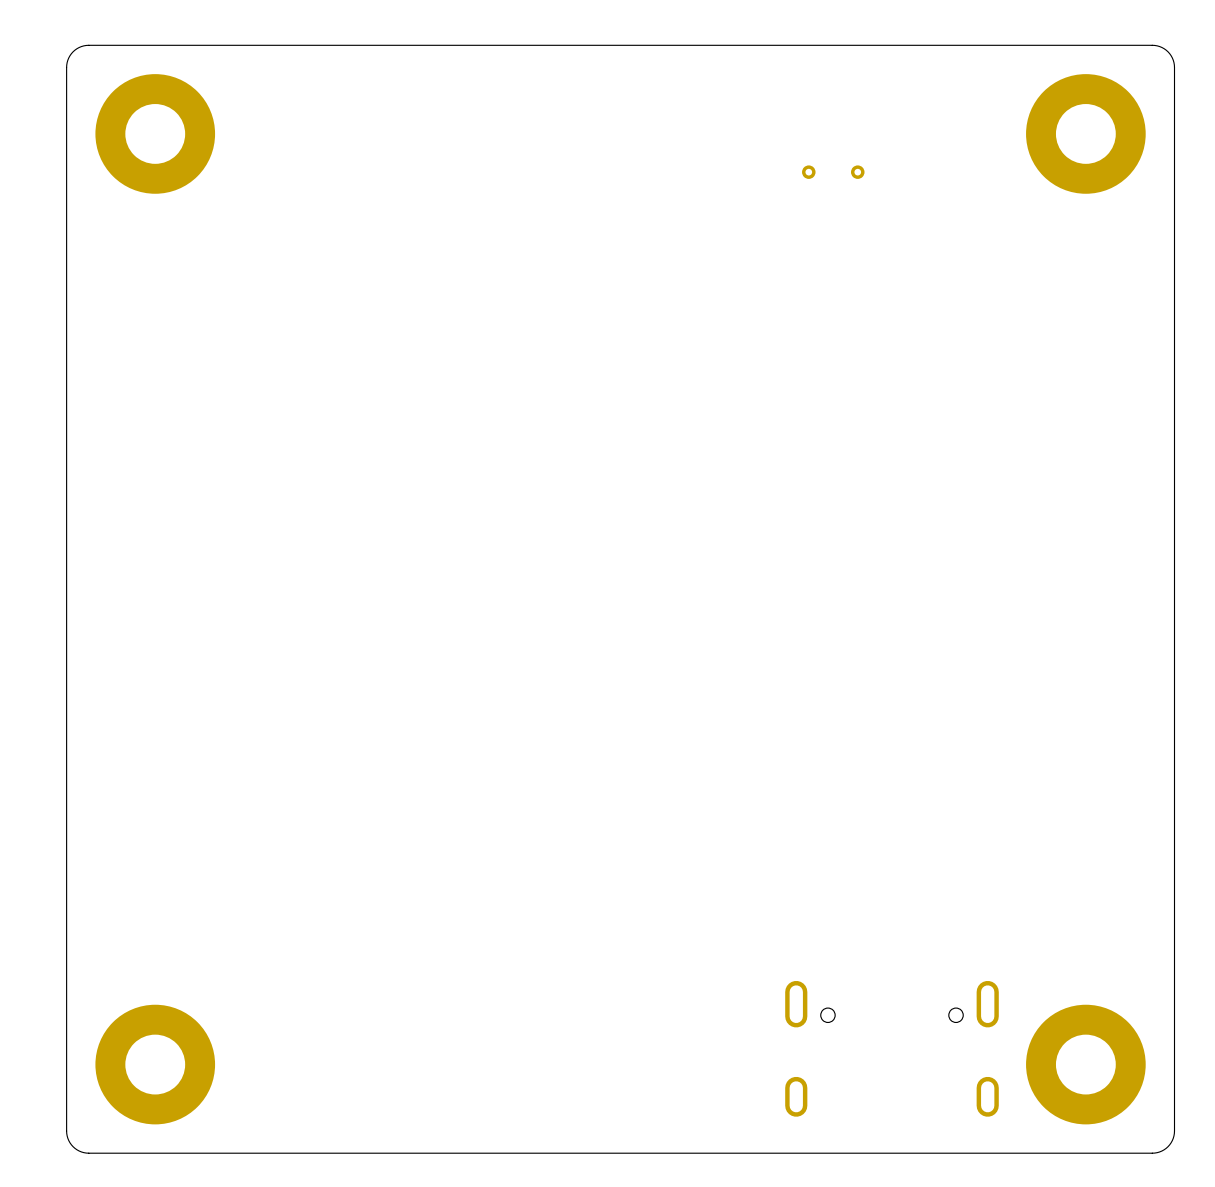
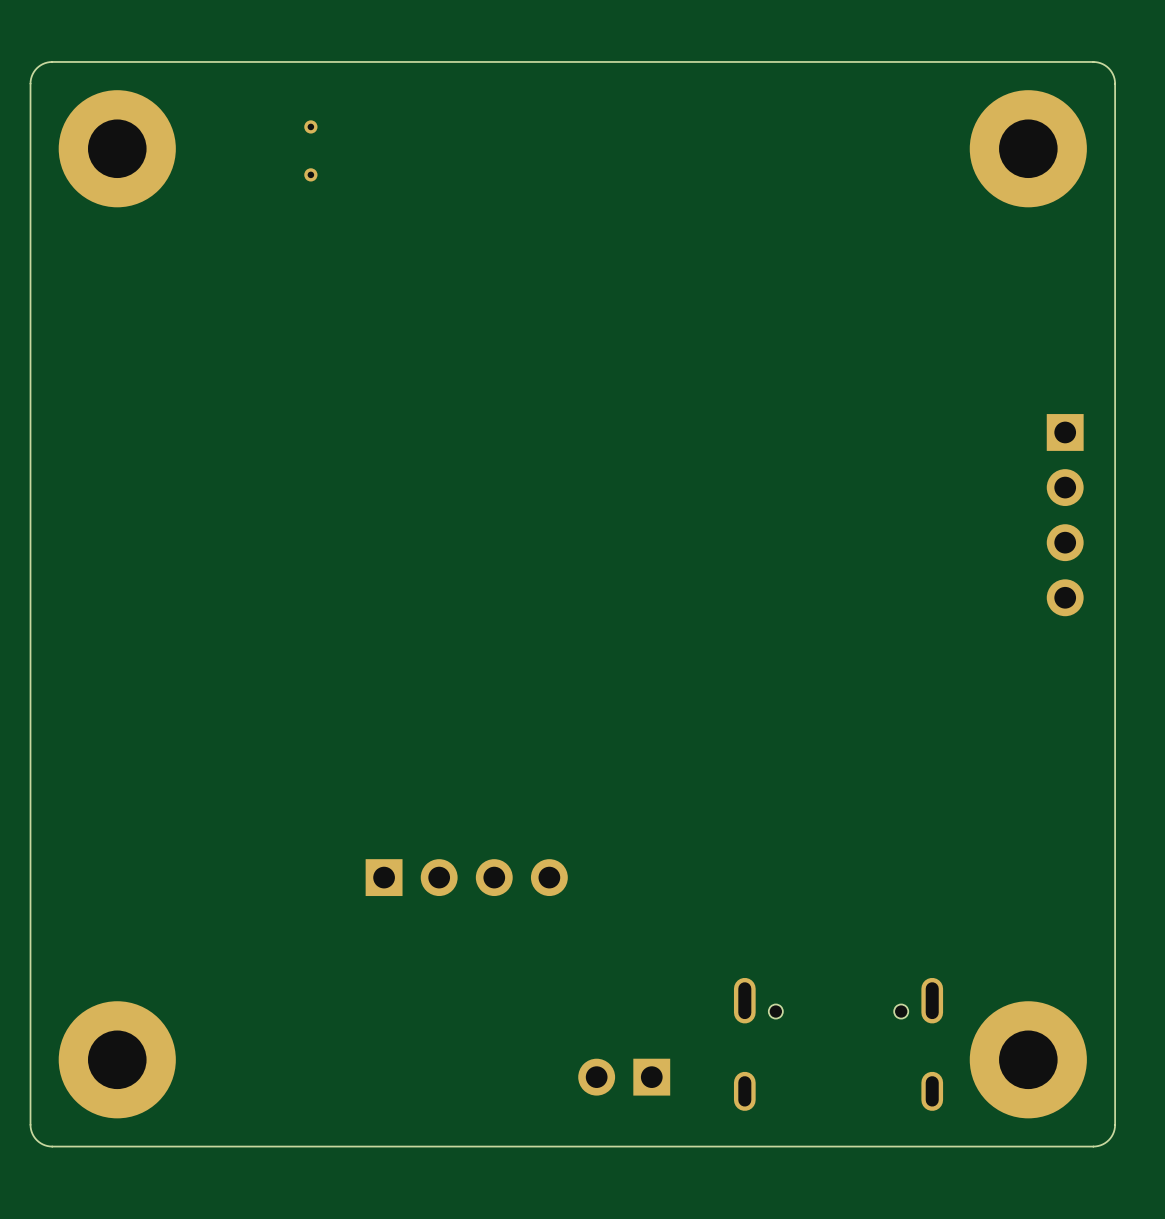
part rotation: 0° (833, 172) -> 90° clockwise (310, 150)
part position: (833, 172) -> (310, 150)
part: none -> (1065, 515)
part: none -> (466, 877)
part: none -> (624, 1077)

